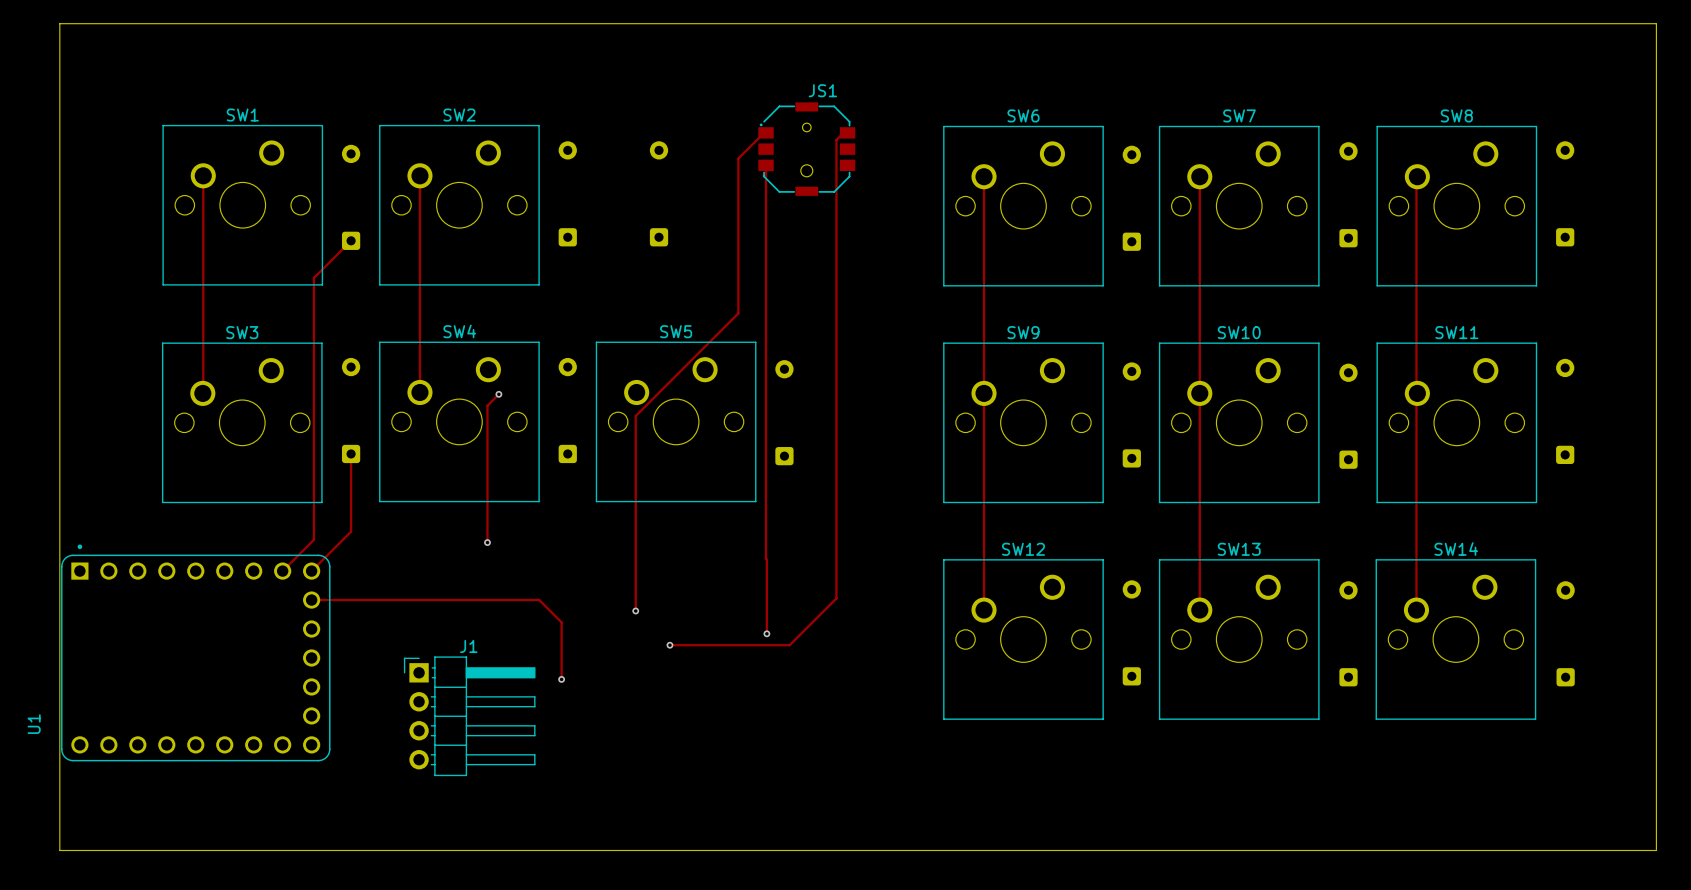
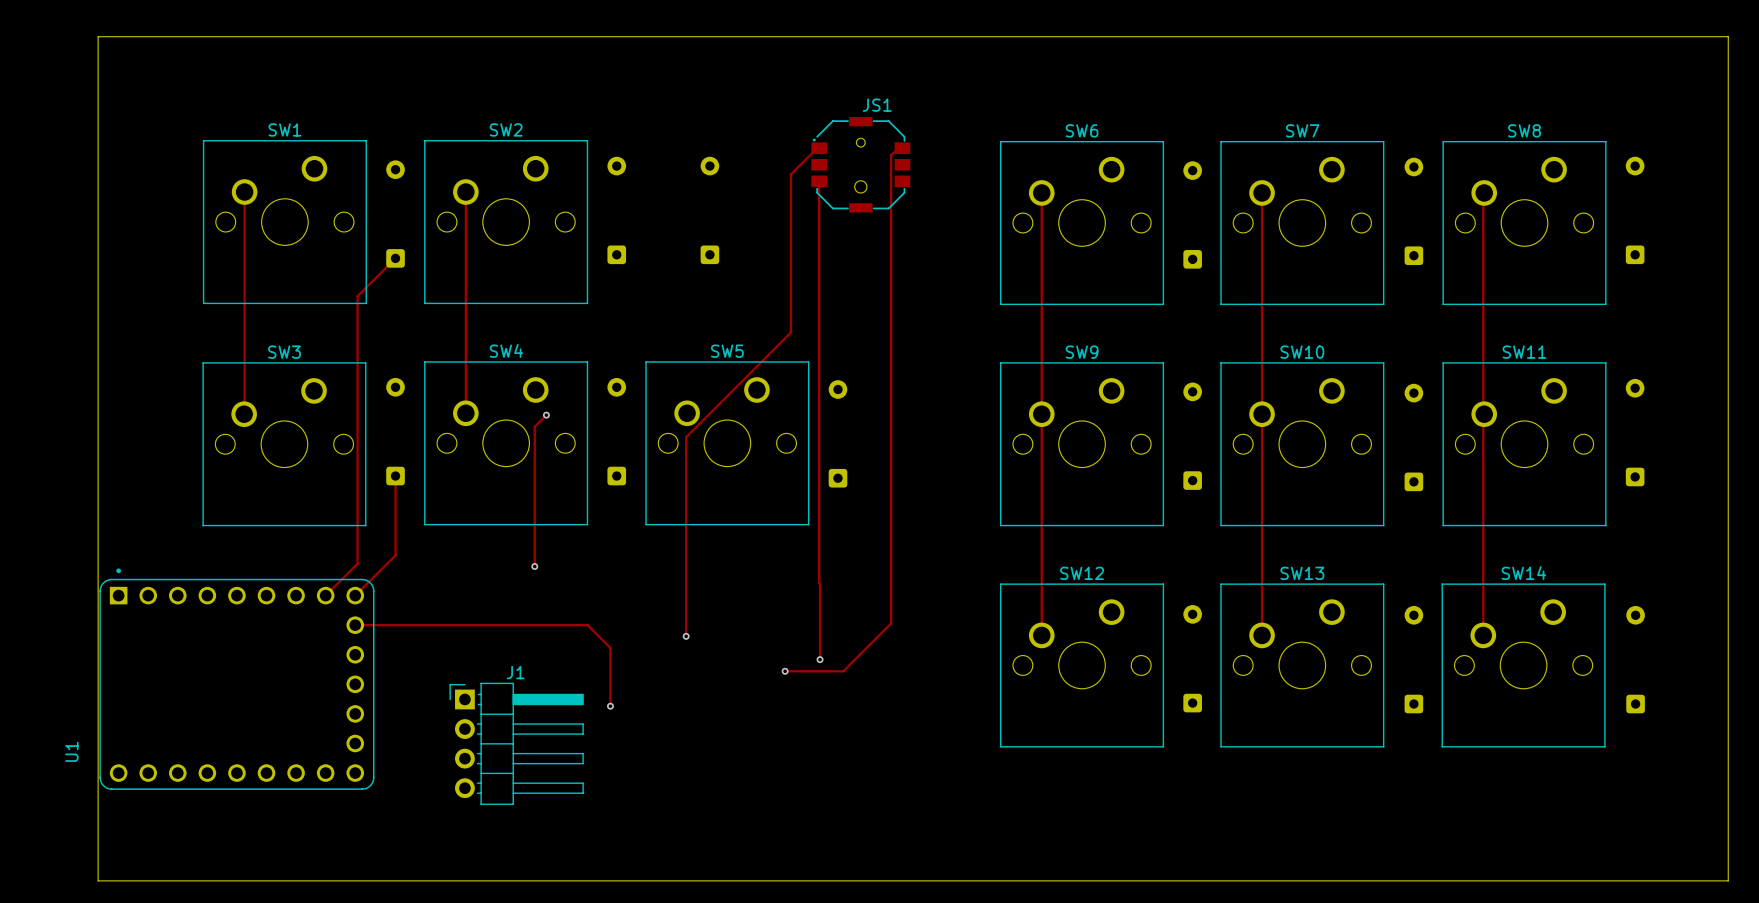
track: (669, 645) (732, 645) -> none
via position: (669, 645) -> (785, 671)

